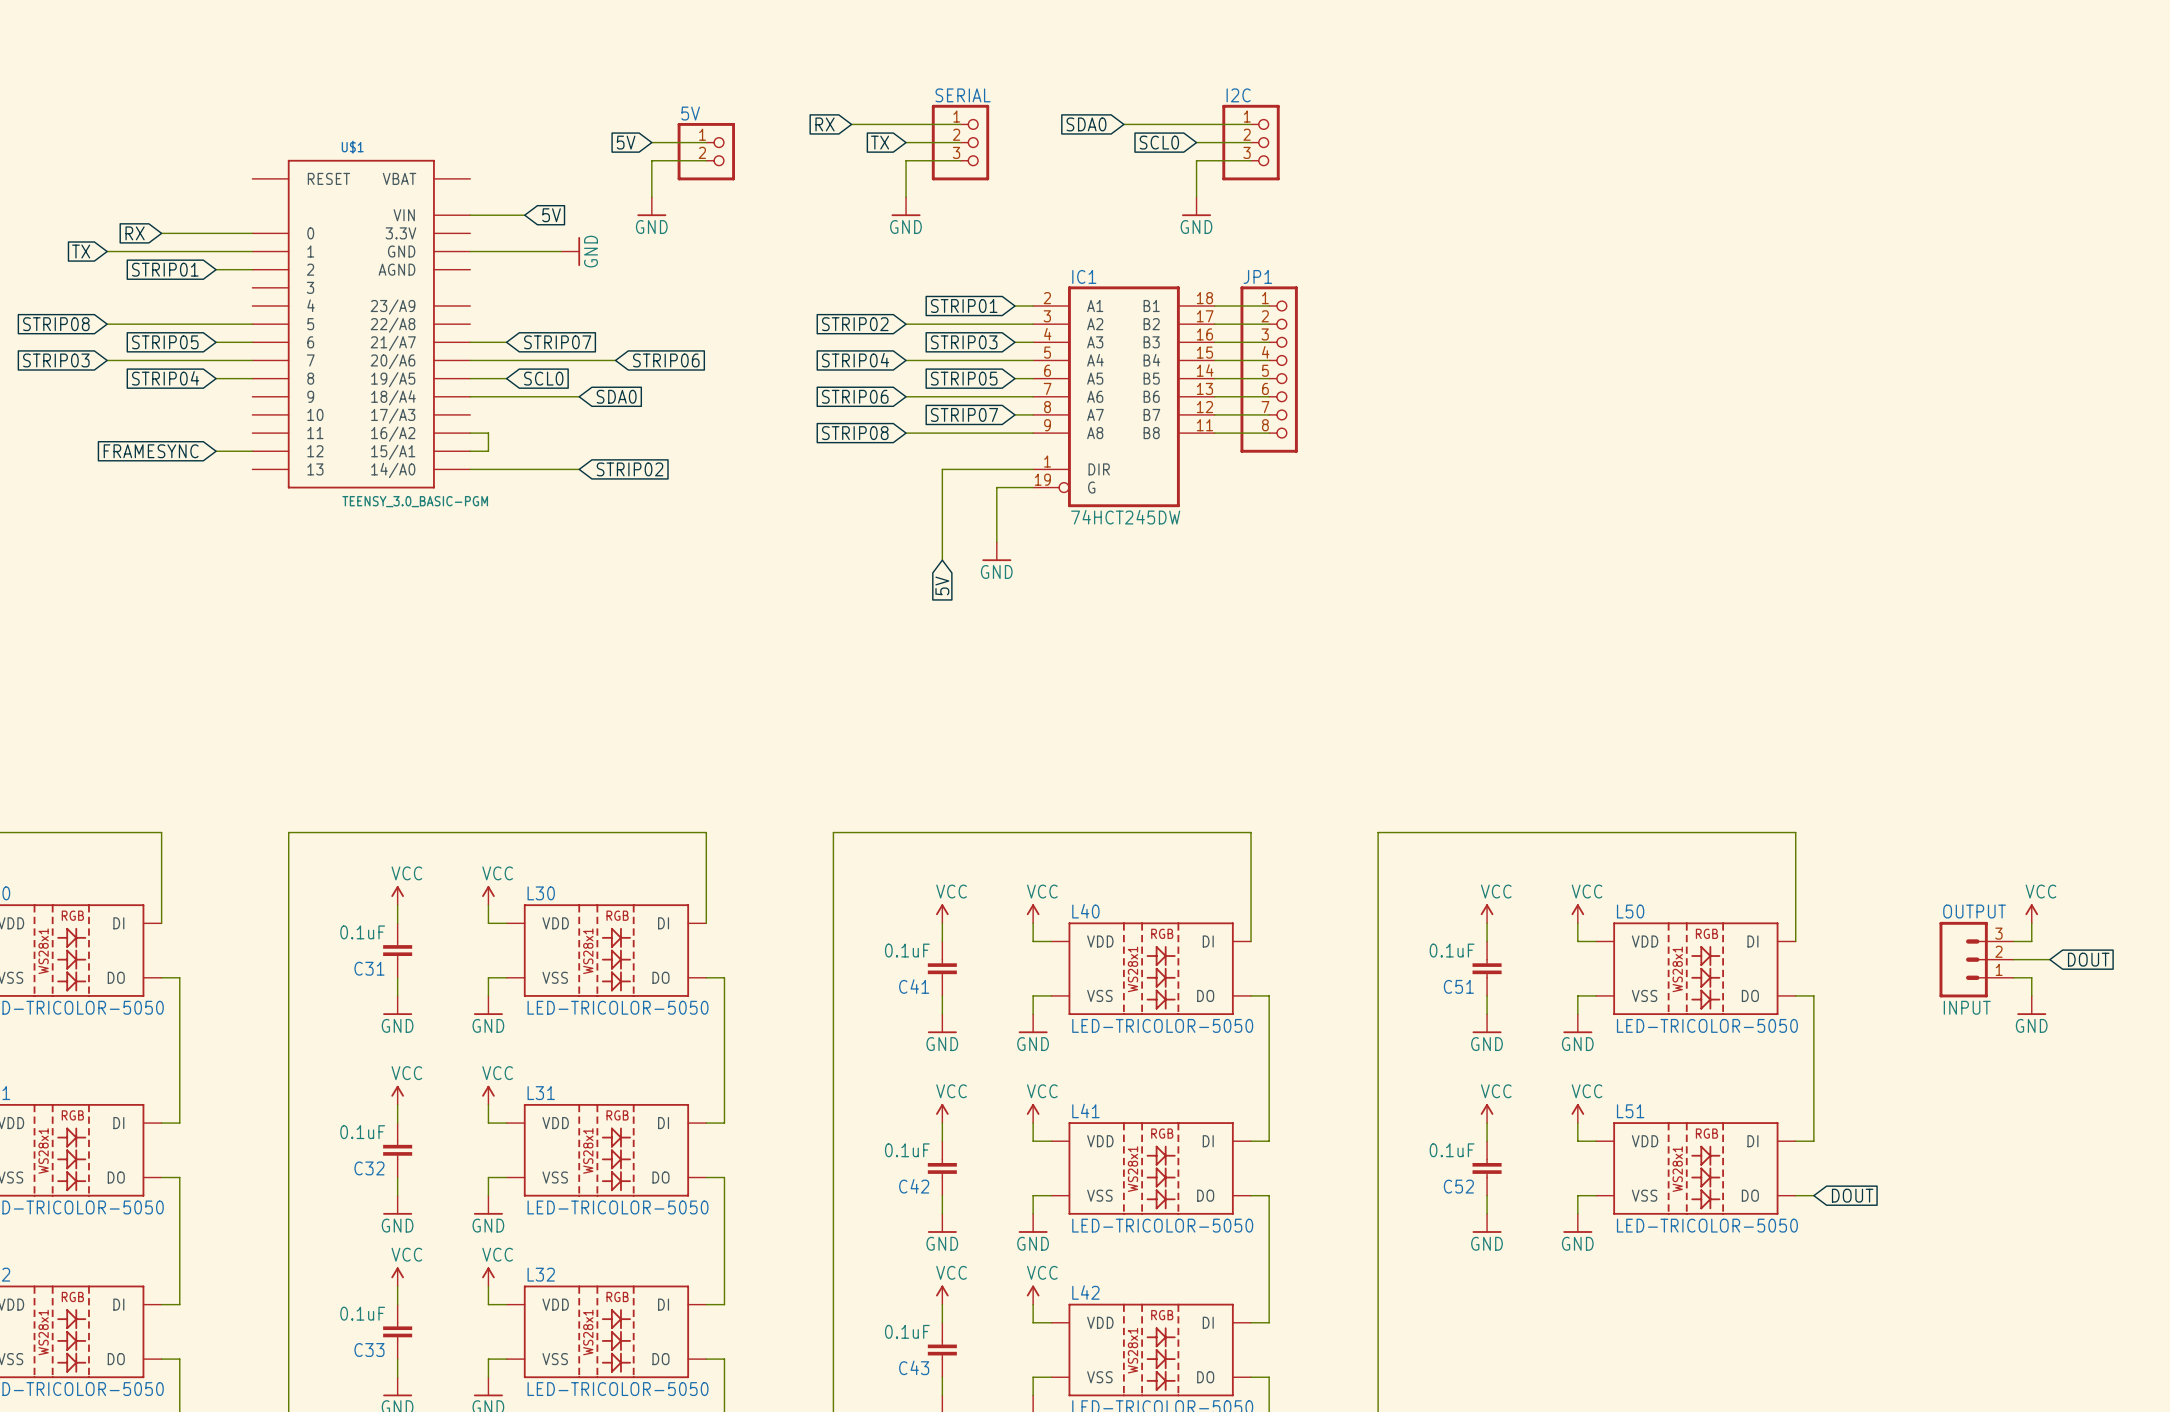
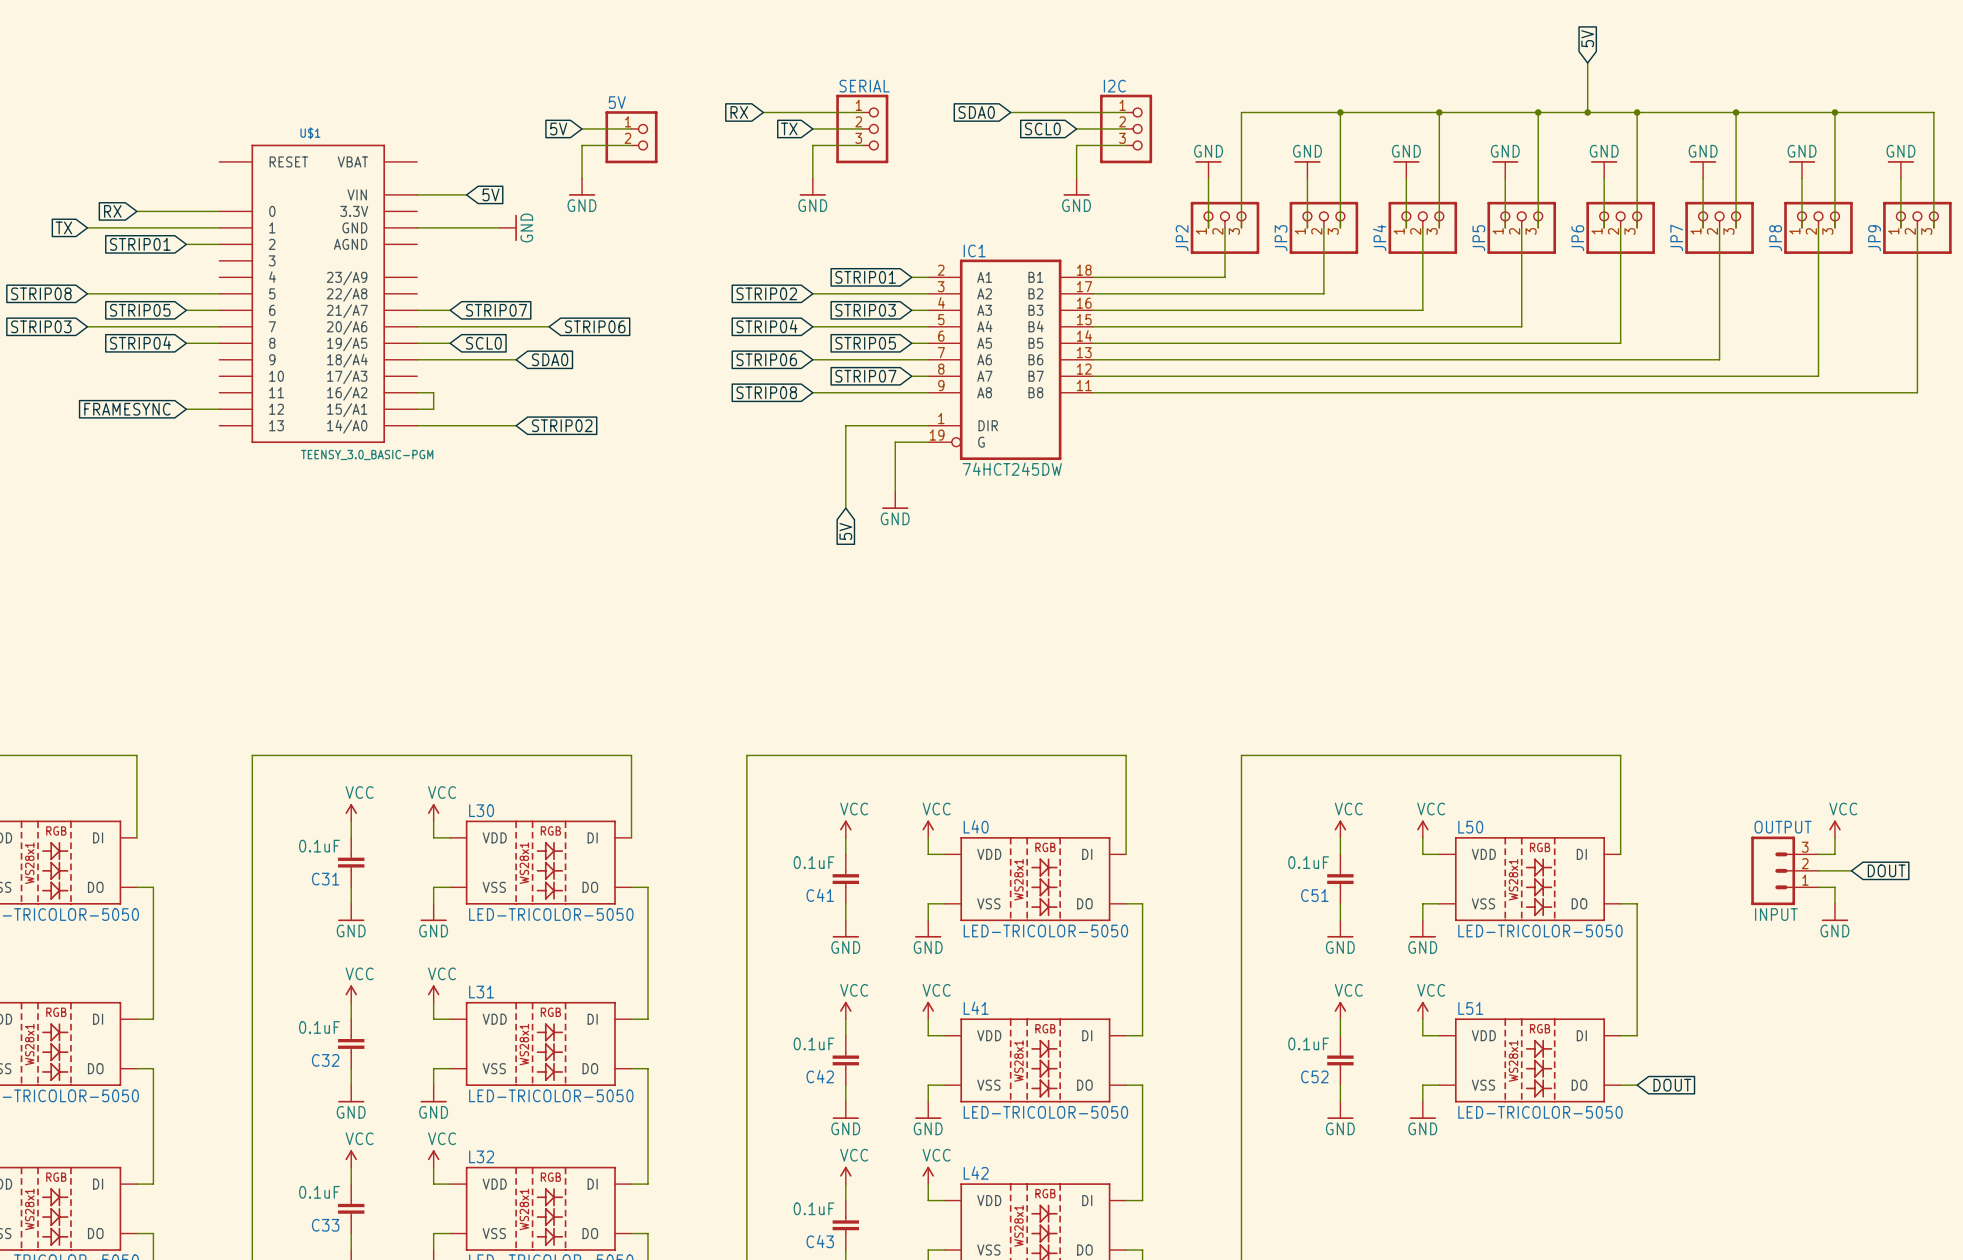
global label: none -> 5V (1587, 38)
wire: none -> (1587, 63) (1587, 112)
wire: none -> (1340, 112) (1340, 227)
junction: none -> (1340, 112)
wire: none -> (1439, 112) (1439, 227)
junction: none -> (1439, 112)
wire: none -> (1538, 112) (1538, 227)
junction: none -> (1538, 112)
junction: none -> (1587, 112)
wire: none -> (1637, 112) (1637, 227)
junction: none -> (1637, 112)
wire: none -> (1736, 112) (1736, 227)
junction: none -> (1736, 112)
wire: none -> (1834, 112) (1834, 227)
junction: none -> (1834, 112)
power symbol: none -> GND (1208, 169)
power symbol: none -> GND (1307, 169)
power symbol: none -> GND (1406, 169)
power symbol: none -> GND (1505, 169)
power symbol: none -> GND (1604, 169)
power symbol: none -> GND (1703, 169)
power symbol: none -> GND (1802, 169)
power symbol: none -> GND (1900, 169)
wire: none -> (1208, 178) (1208, 227)
wire: none -> (1307, 178) (1307, 227)
wire: none -> (1406, 178) (1406, 227)
wire: none -> (1505, 178) (1505, 227)
wire: none -> (1604, 178) (1604, 227)
wire: none -> (1703, 178) (1703, 227)
wire: none -> (1802, 178) (1802, 227)
wire: none -> (1900, 178) (1900, 227)
wire: none -> (1224, 227) (1224, 277) (1142, 277)
JP2: none -> (1224, 227)
wire: none -> (1241, 227) (1241, 112) (1933, 112) (1933, 227)
wire: none -> (1323, 227) (1323, 293) (1142, 293)
JP3: none -> (1323, 227)
wire: none -> (1422, 227) (1422, 310) (1142, 310)
JP4: none -> (1422, 227)
wire: none -> (1521, 227) (1521, 326) (1142, 326)
JP5: none -> (1521, 227)
wire: none -> (1620, 227) (1620, 343) (1142, 343)
JP6: none -> (1620, 227)
wire: none -> (1719, 227) (1719, 359) (1142, 359)
JP7: none -> (1719, 227)
wire: none -> (1818, 227) (1818, 376) (1142, 376)
JP8: none -> (1818, 227)
wire: none -> (1917, 227) (1917, 392) (1142, 392)
JP9: none -> (1917, 227)
JP1: (1269, 369) -> none

